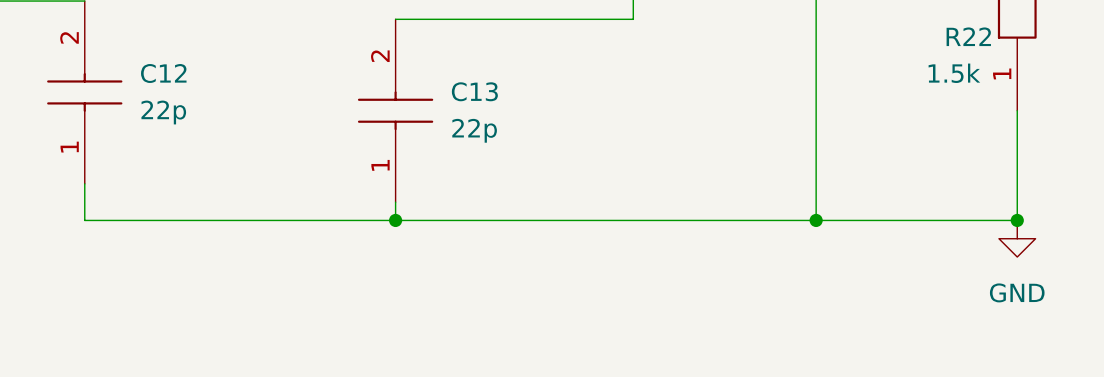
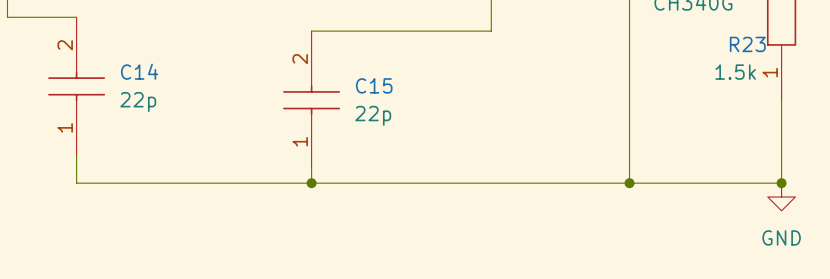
R22 name: R22 (968, 36) -> R23 (747, 44)
C12 name: C12 (163, 73) -> C14 (139, 71)
C13 name: C13 (474, 91) -> C15 (374, 85)

